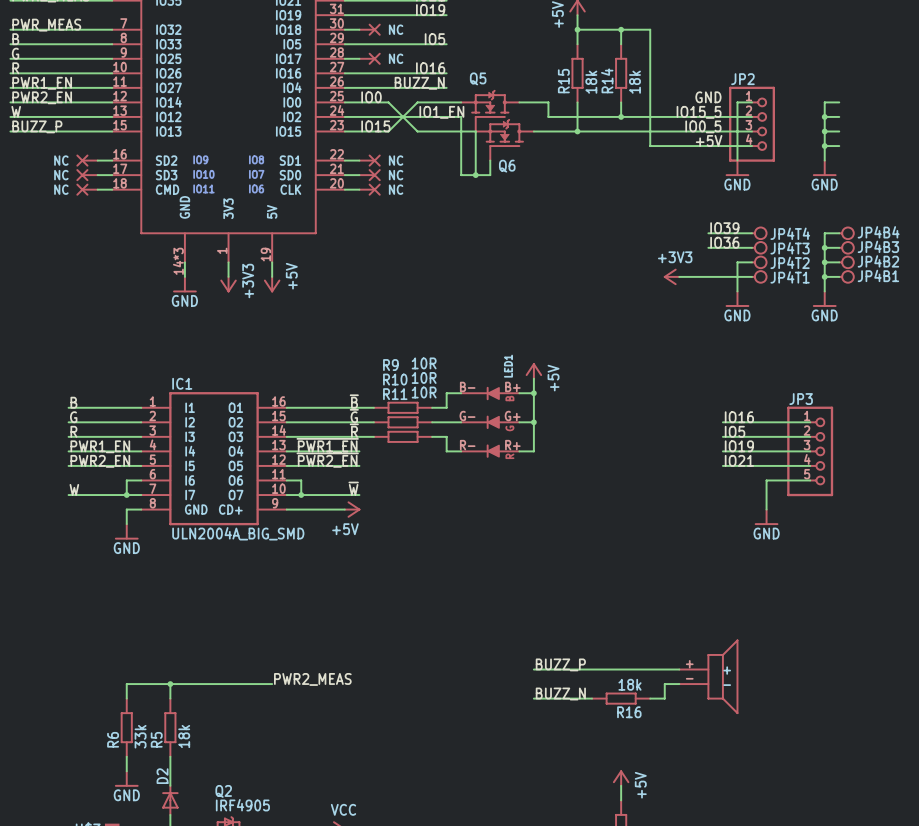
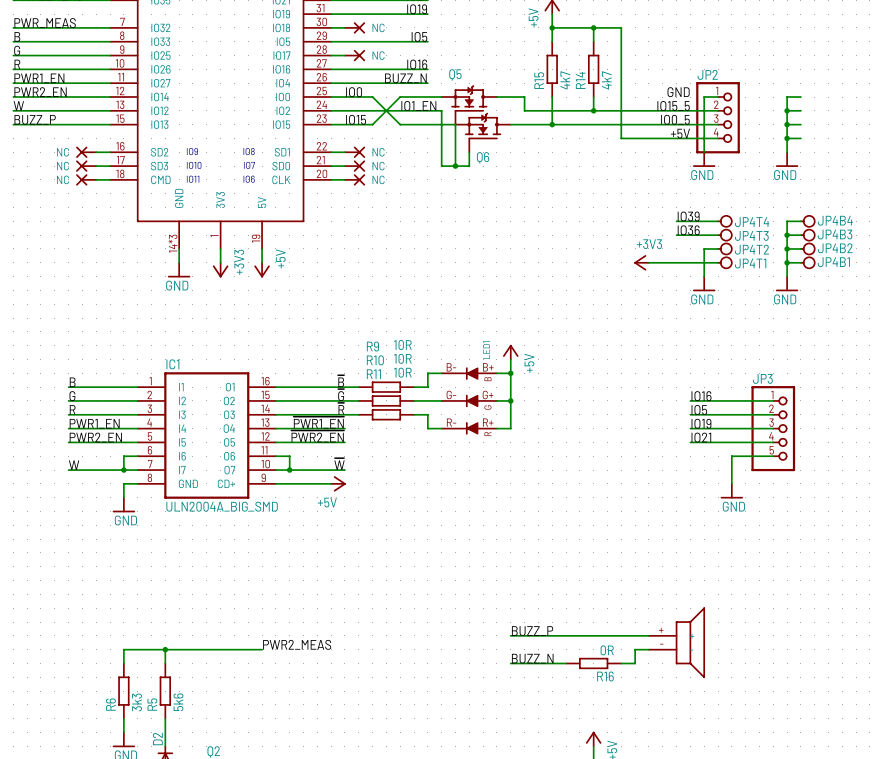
R15 value: 18k (591, 82) -> 4k7 (565, 80)
R14 value: 18k (634, 82) -> 4k7 (606, 80)
R16 value: 18k (629, 684) -> 0R (607, 650)
R6 value: 33k (140, 736) -> 3k3 (137, 702)
R5 value: 18k (184, 736) -> 5k6 (178, 702)

